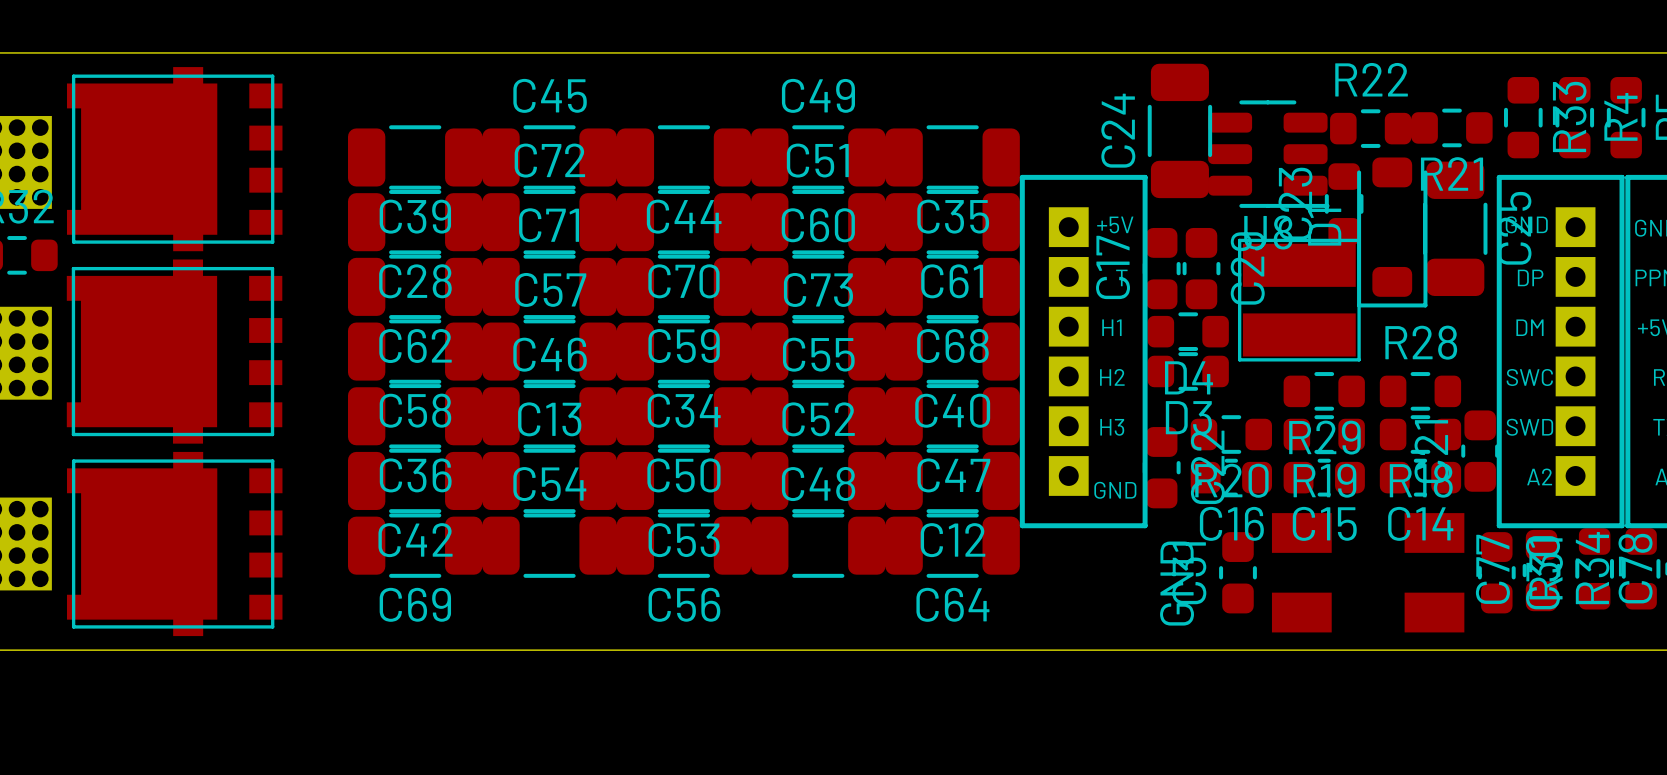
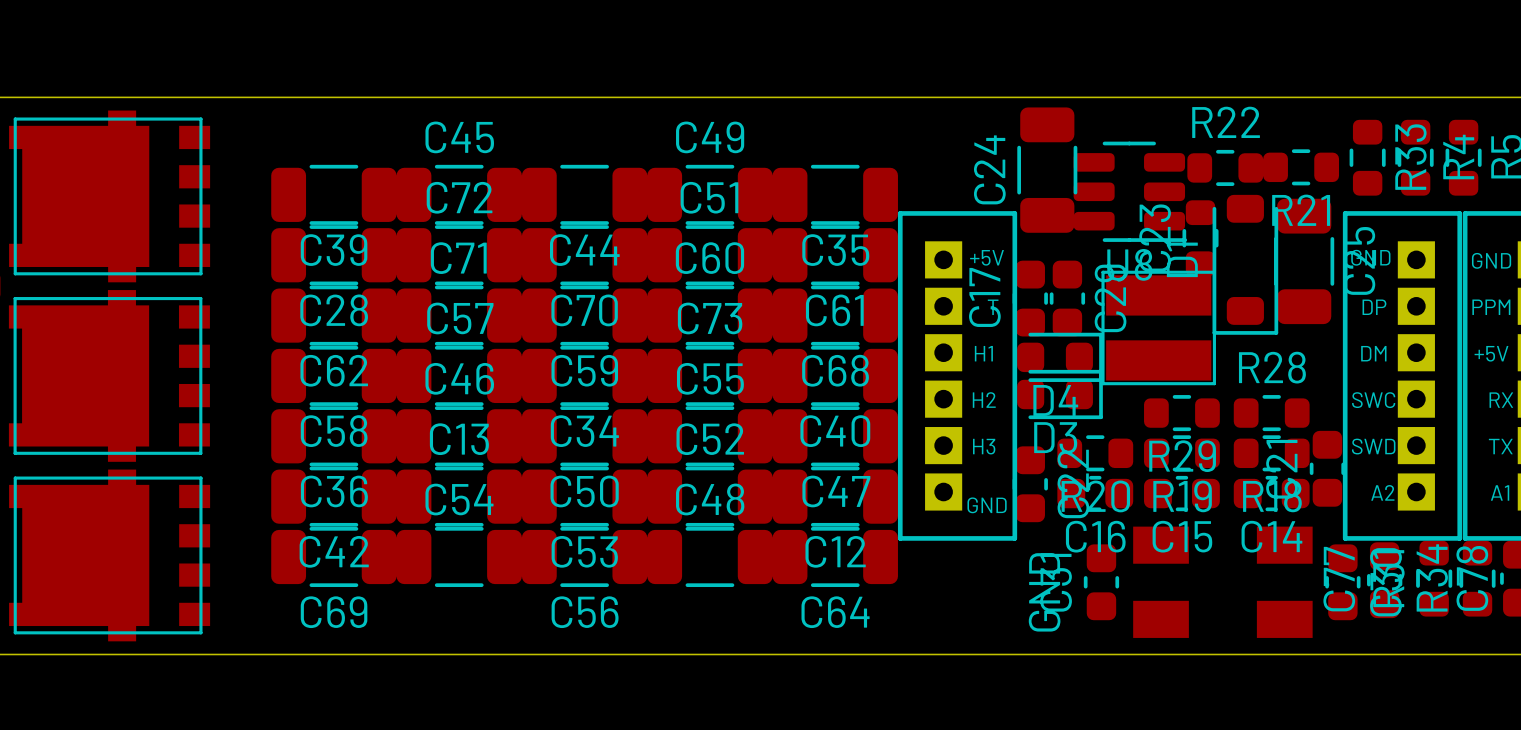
D4 footprint: [1147, 312, 1229, 351] -> [1017, 332, 1103, 382]
D3 footprint: [1147, 352, 1229, 391] -> [1017, 369, 1103, 420]

